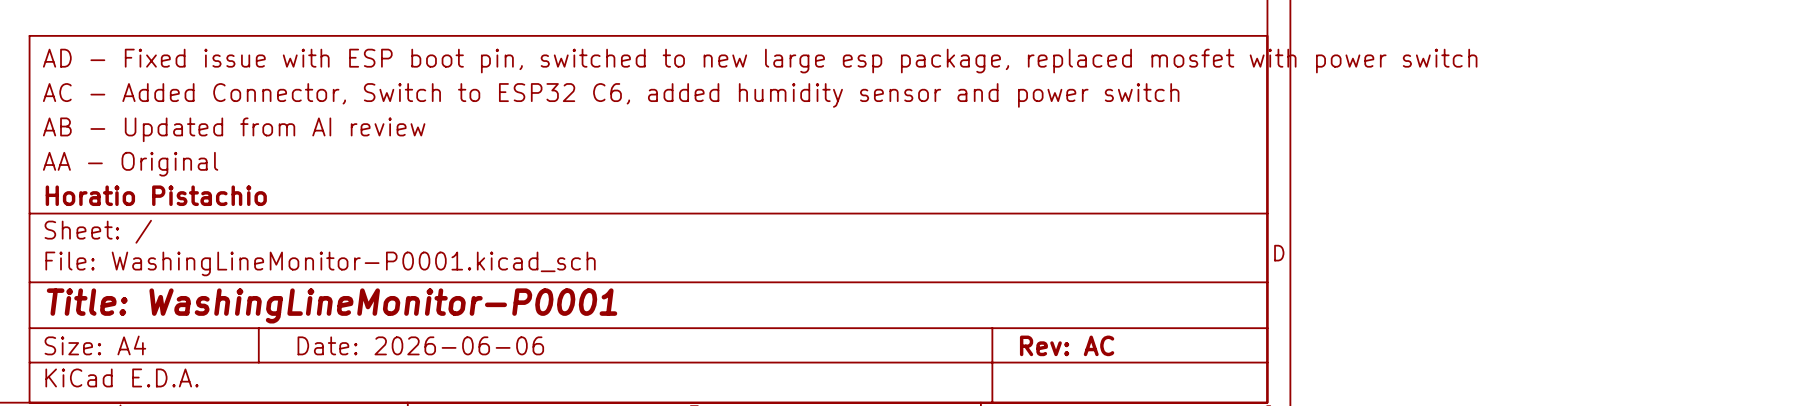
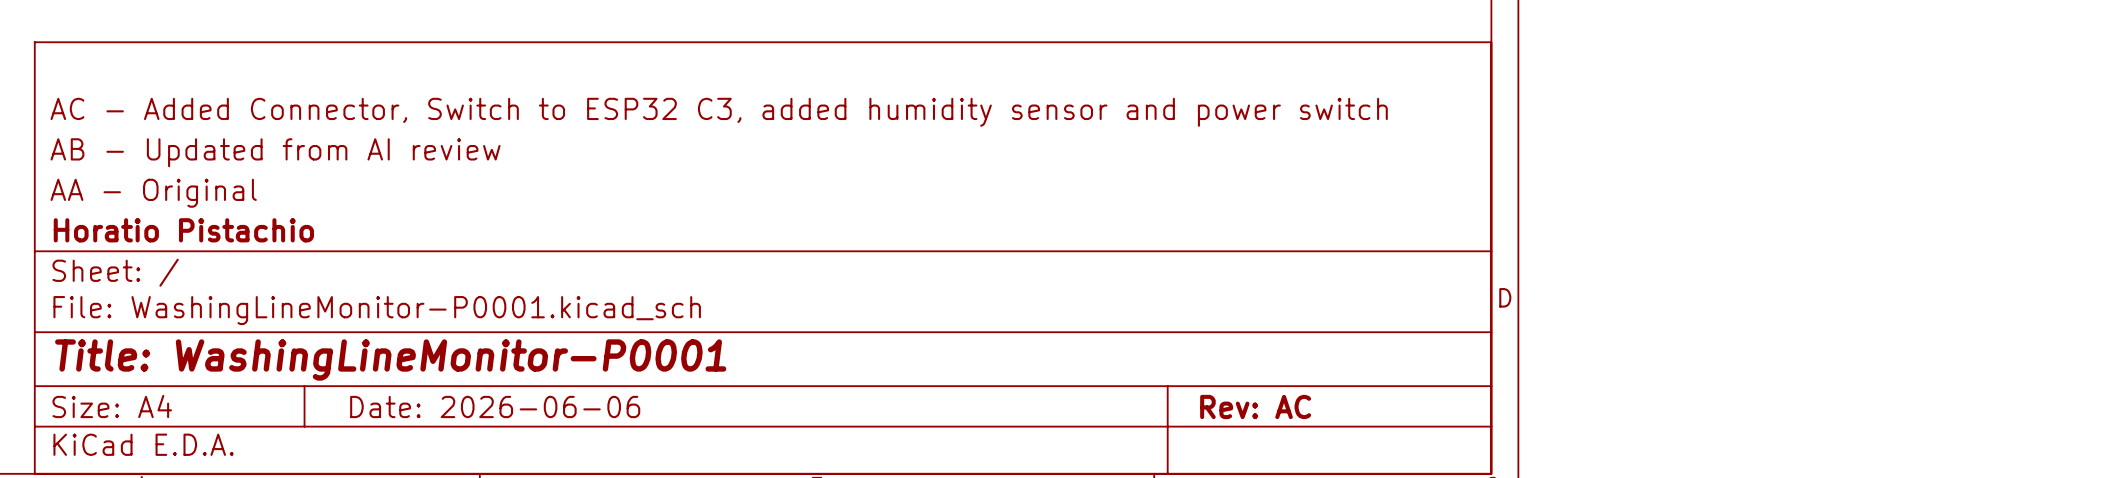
title block: AD - Fixed issue with ESP boot pin, switched to new large esp package, replaced mosfet with power switch (760, 61) -> none
title block: AC - Added Connector, Switch to ESP32 C6, added humidity sensor and power switch (611, 95) -> AC - Added Connector, Switch to ESP32 C3, added humidity sensor and power switch (719, 112)

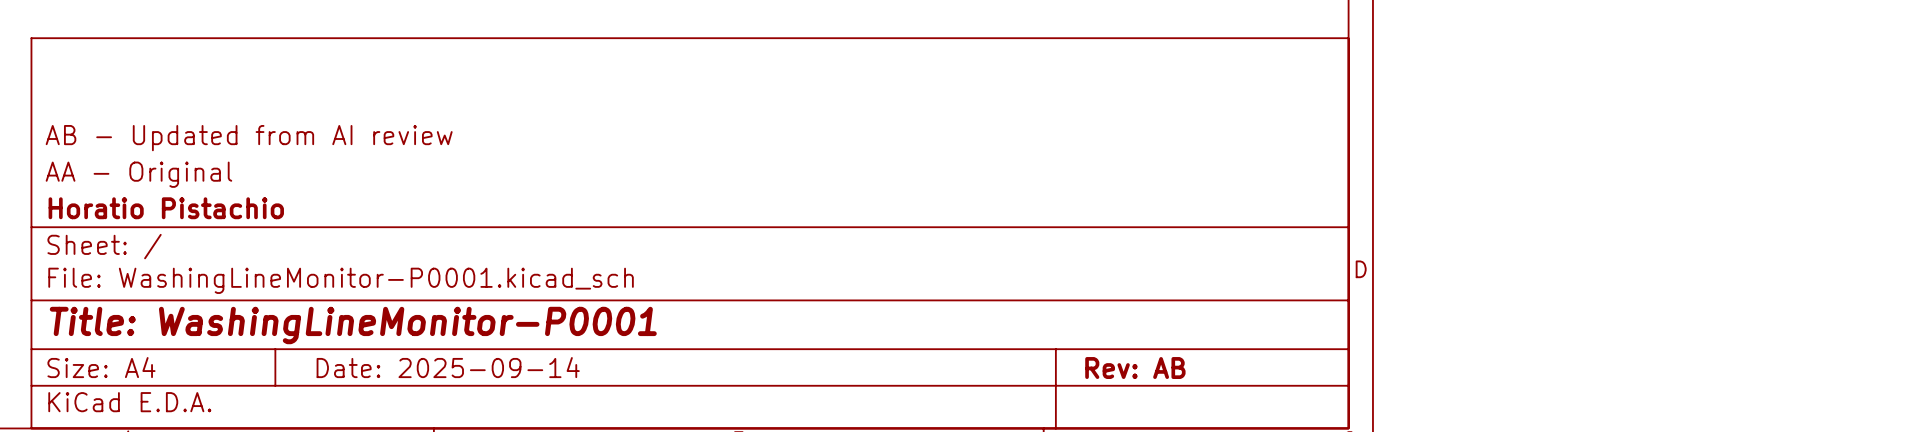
title block: AC - Added Connector, Switch to ESP32 C3, added humidity sensor and power switch (719, 112) -> none
title block: Date: 2026-06-06 (495, 406) -> Date: 2025-09-14 (448, 367)
title block: Rev: AC (1255, 406) -> Rev: AB (1135, 368)

